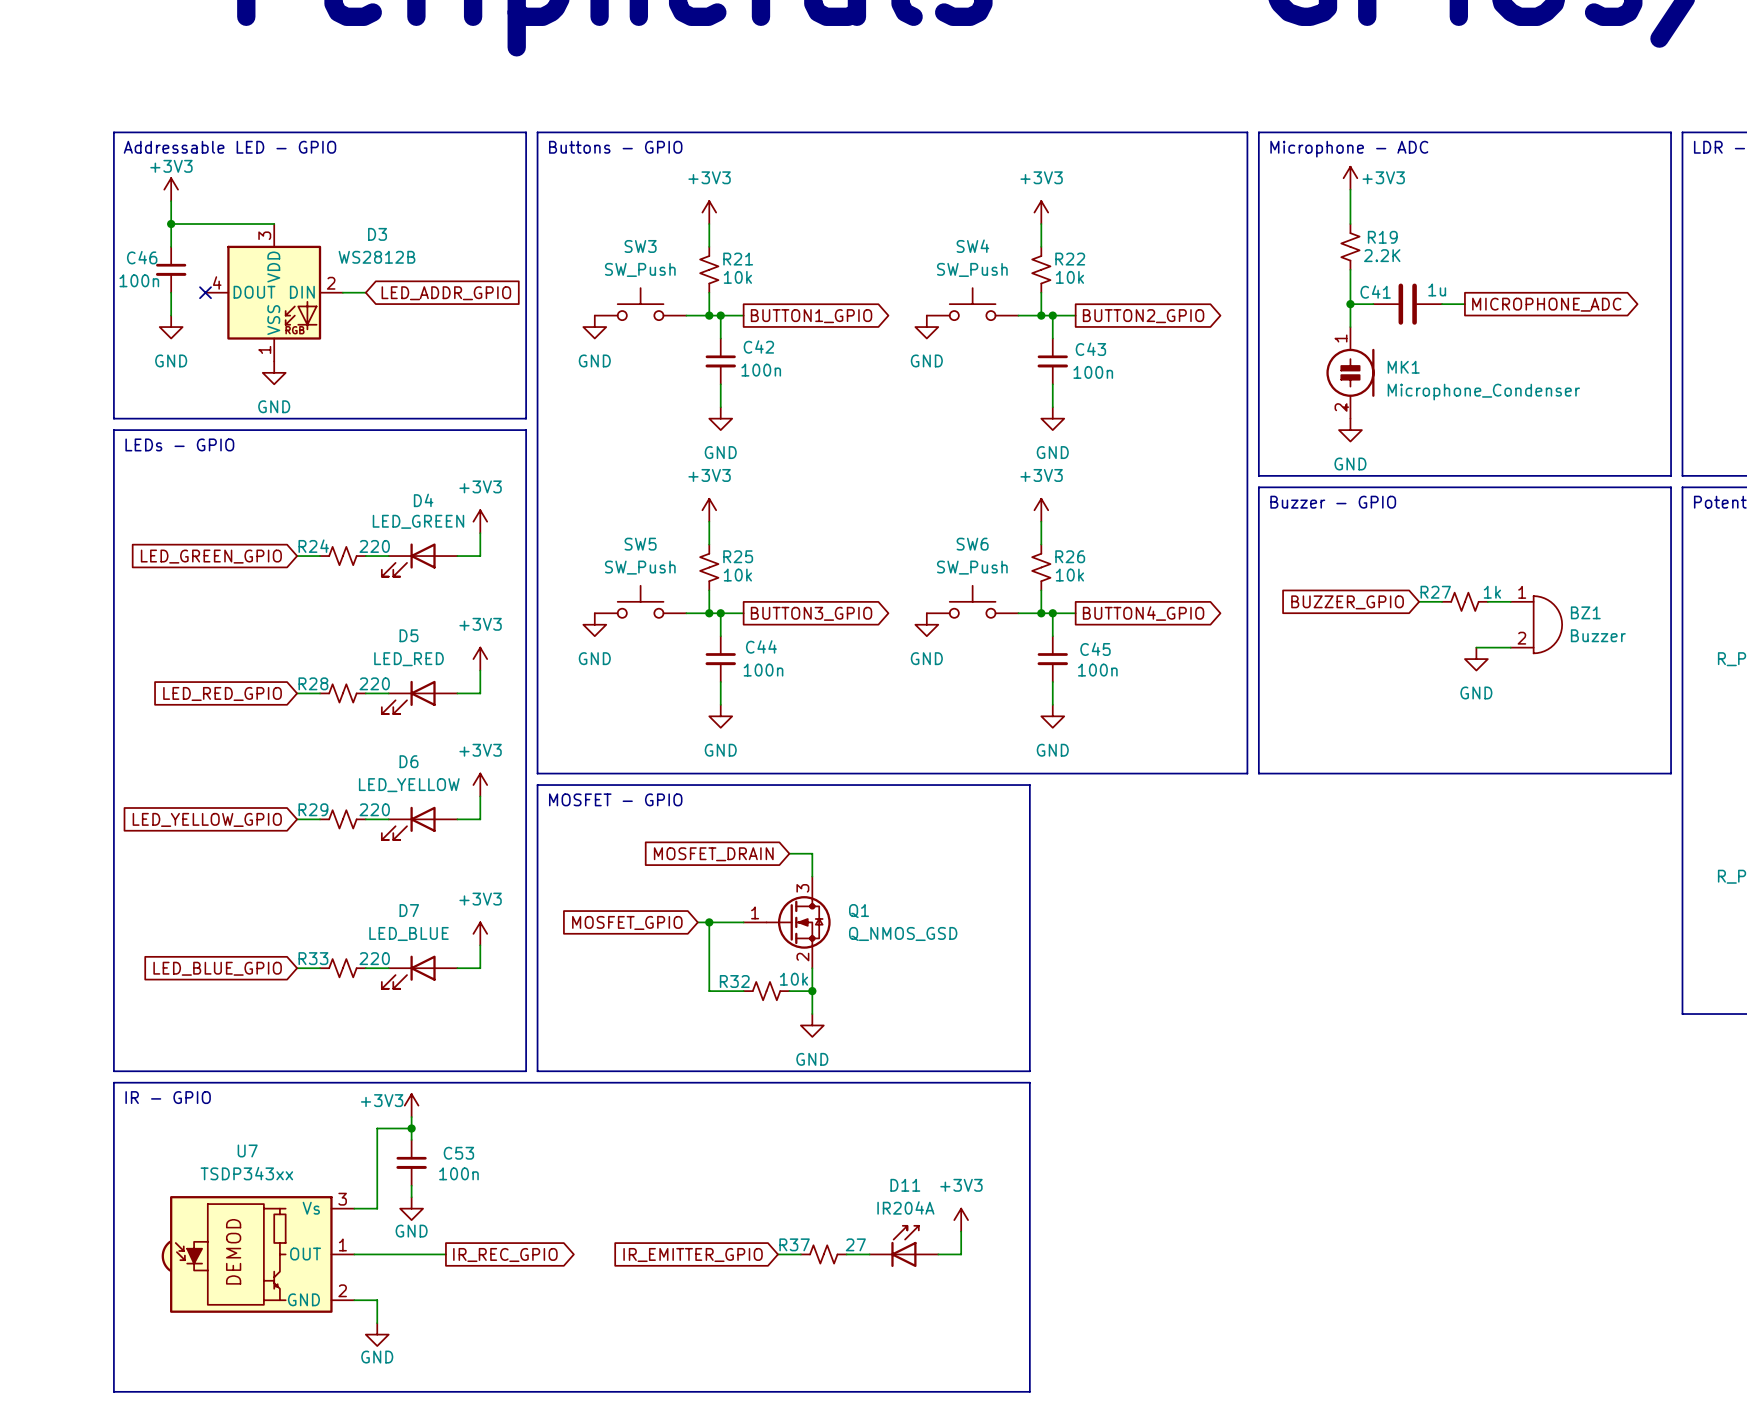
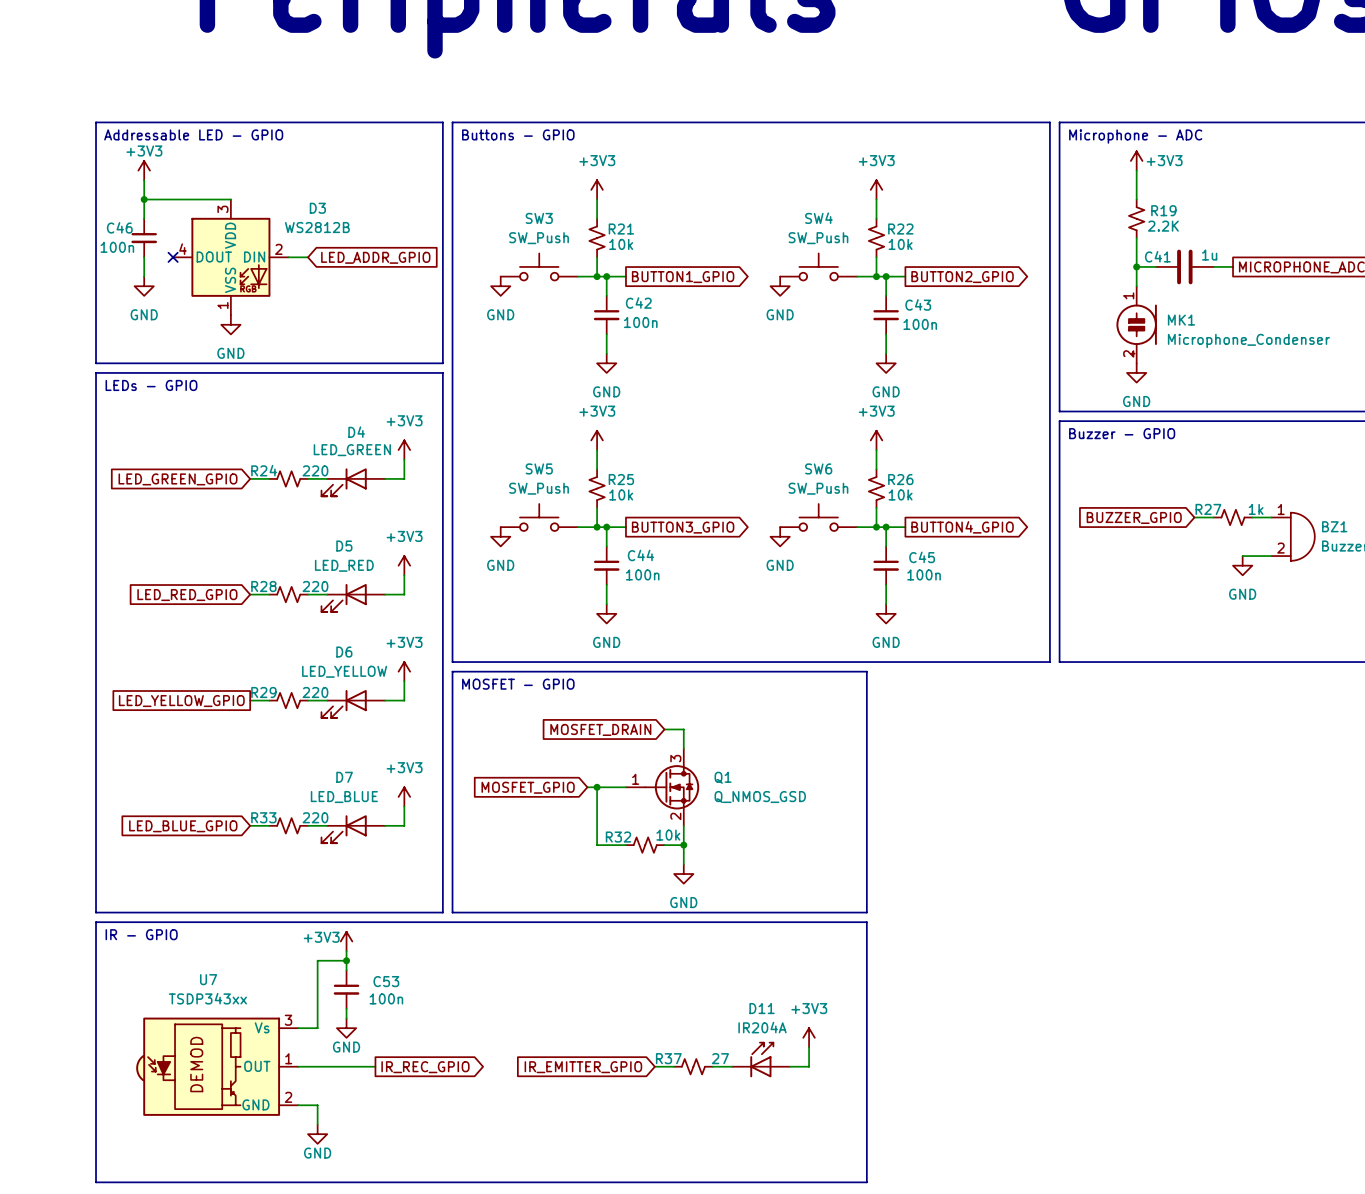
global label shape: input (207, 819) -> passive (181, 701)

